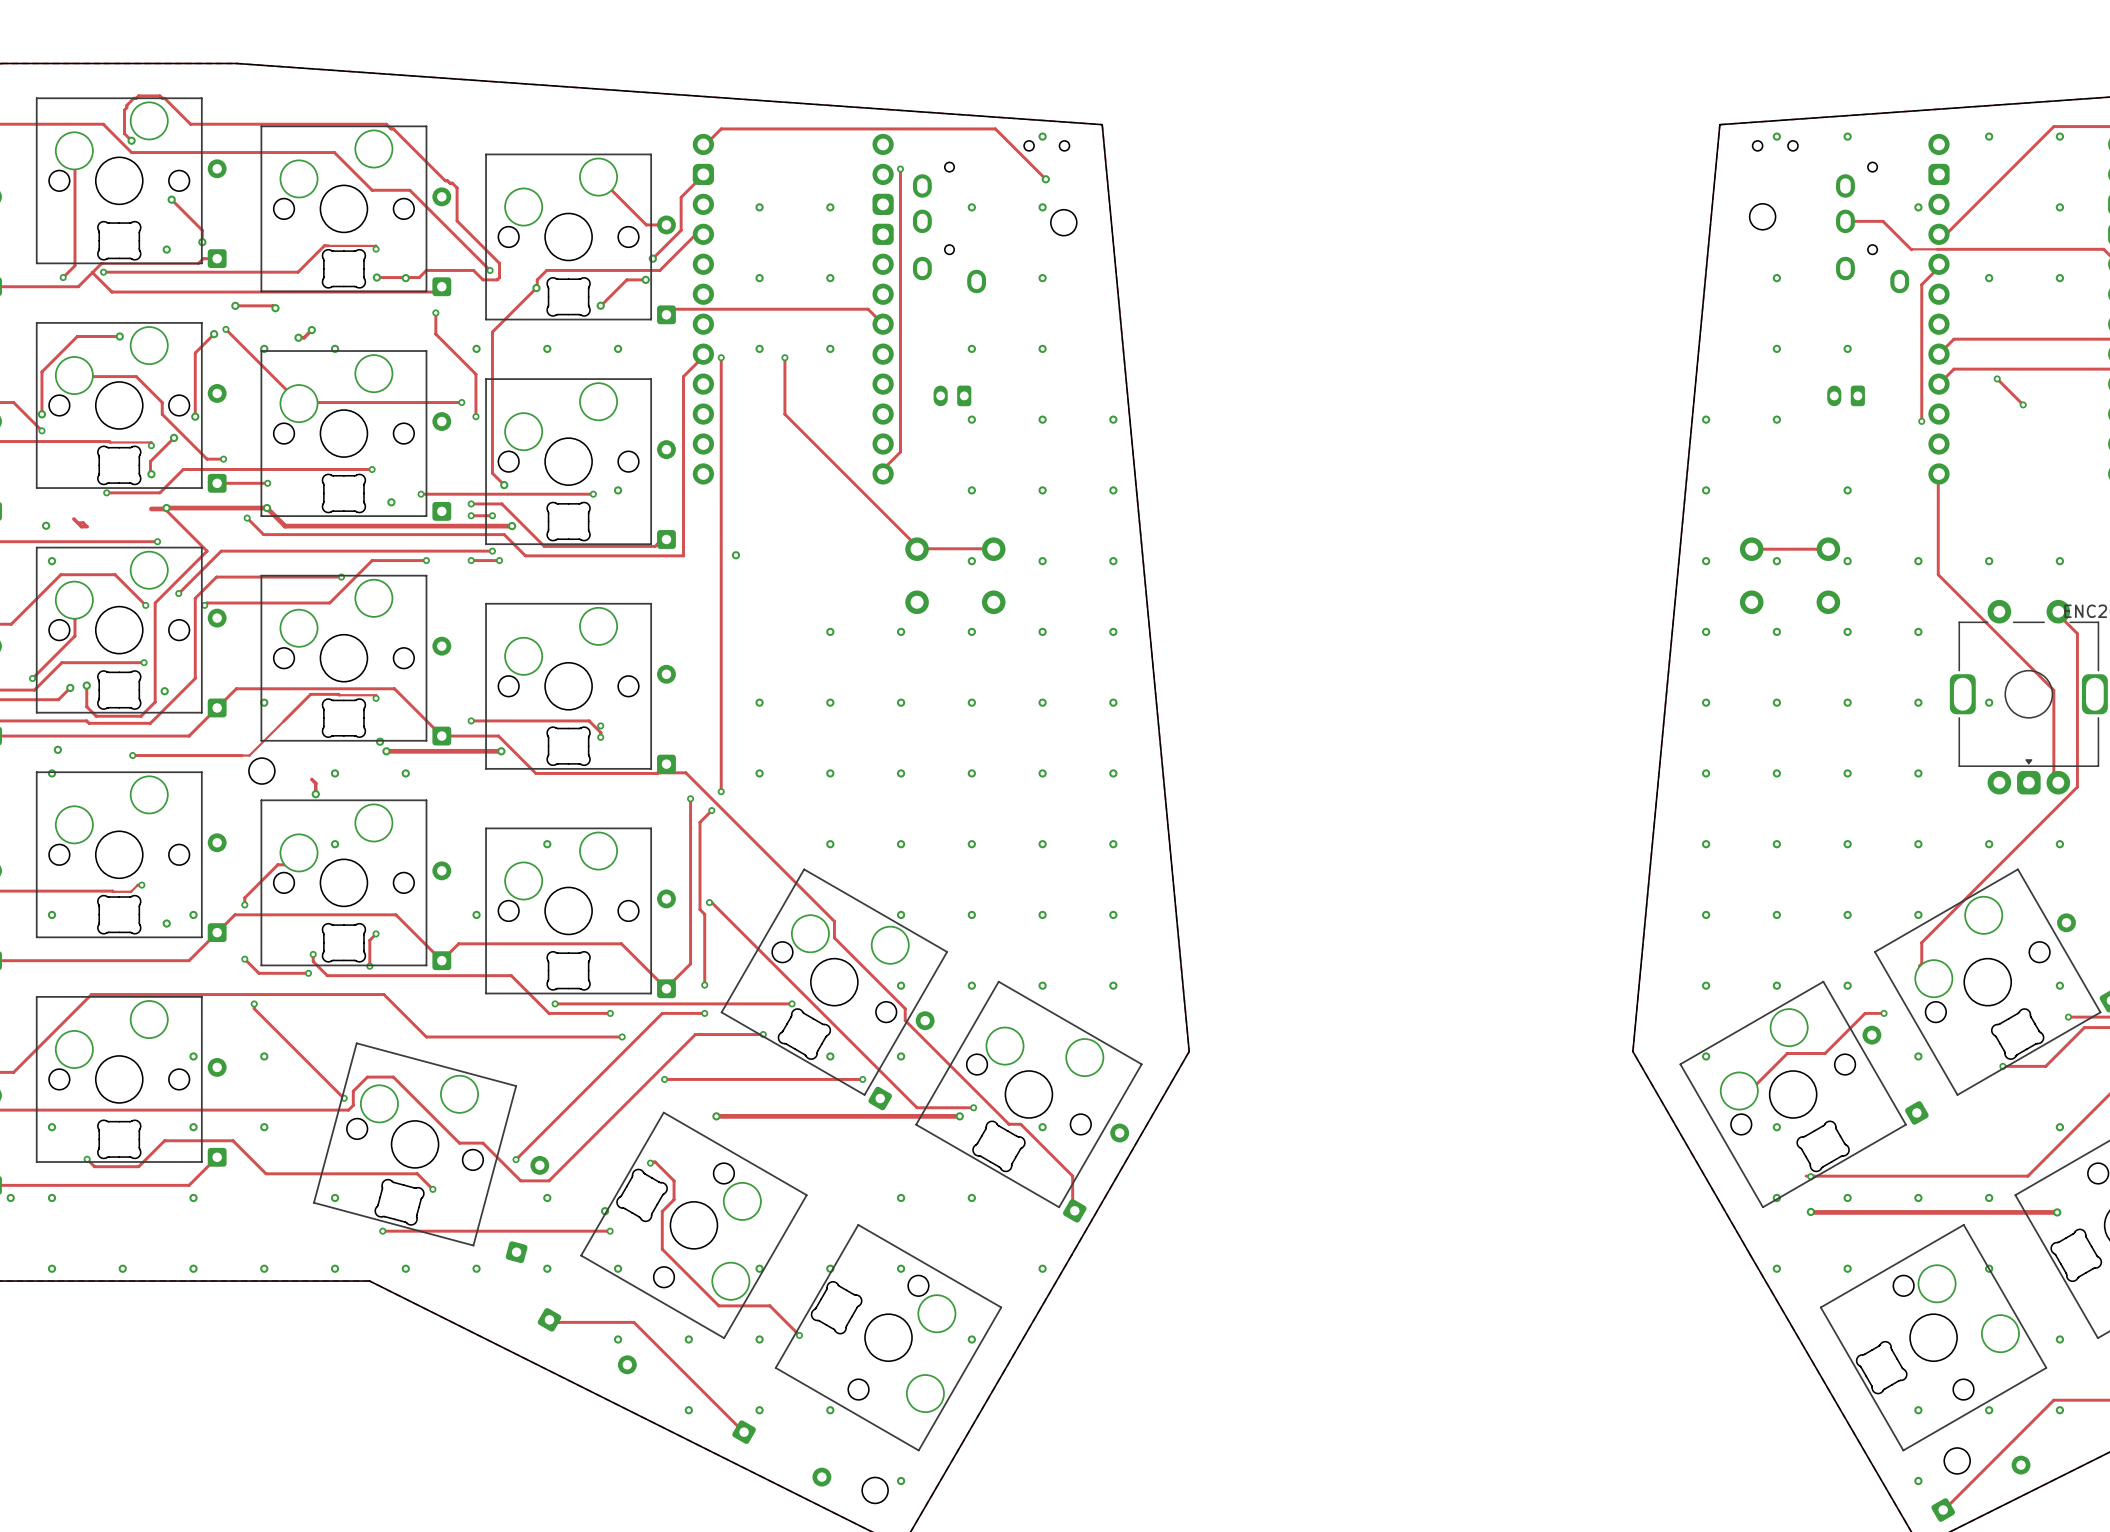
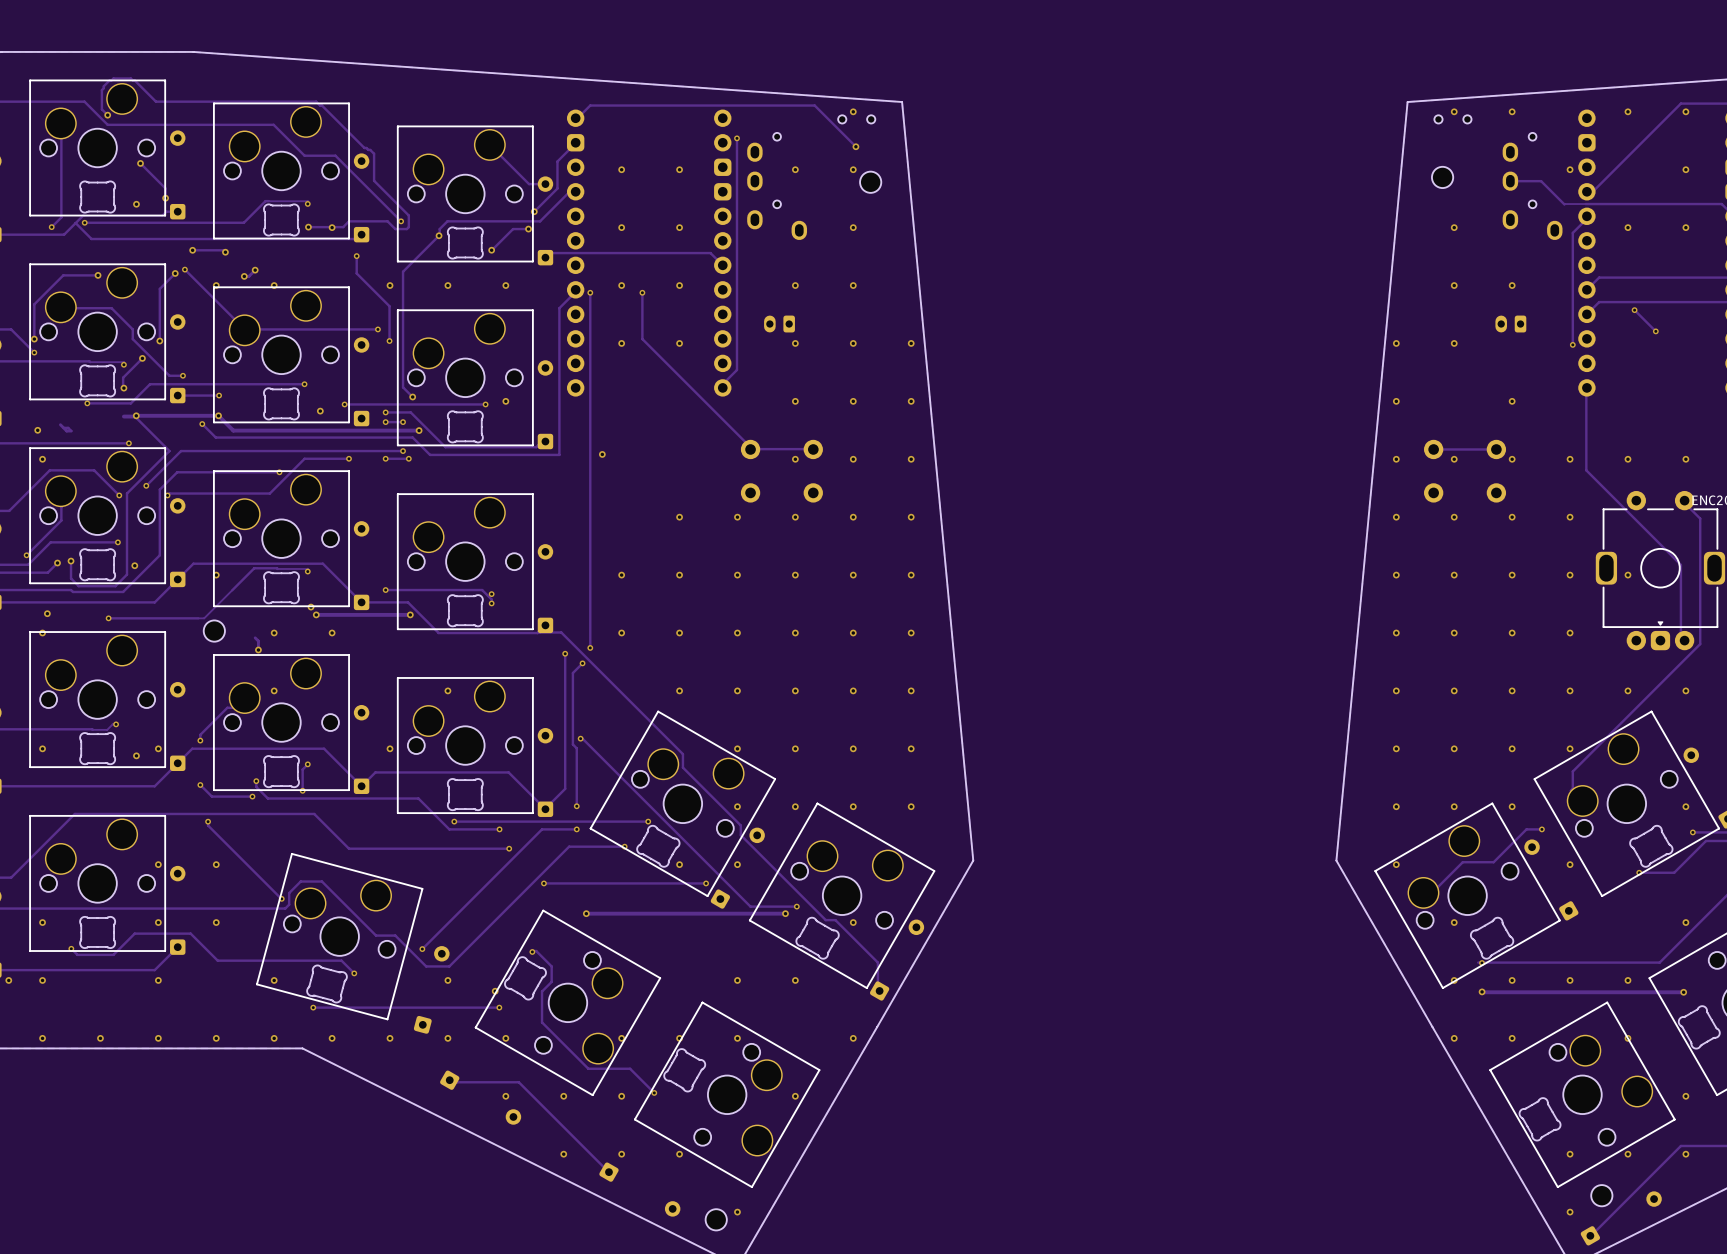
via: none -> (621, 343)
via: none -> (679, 343)

